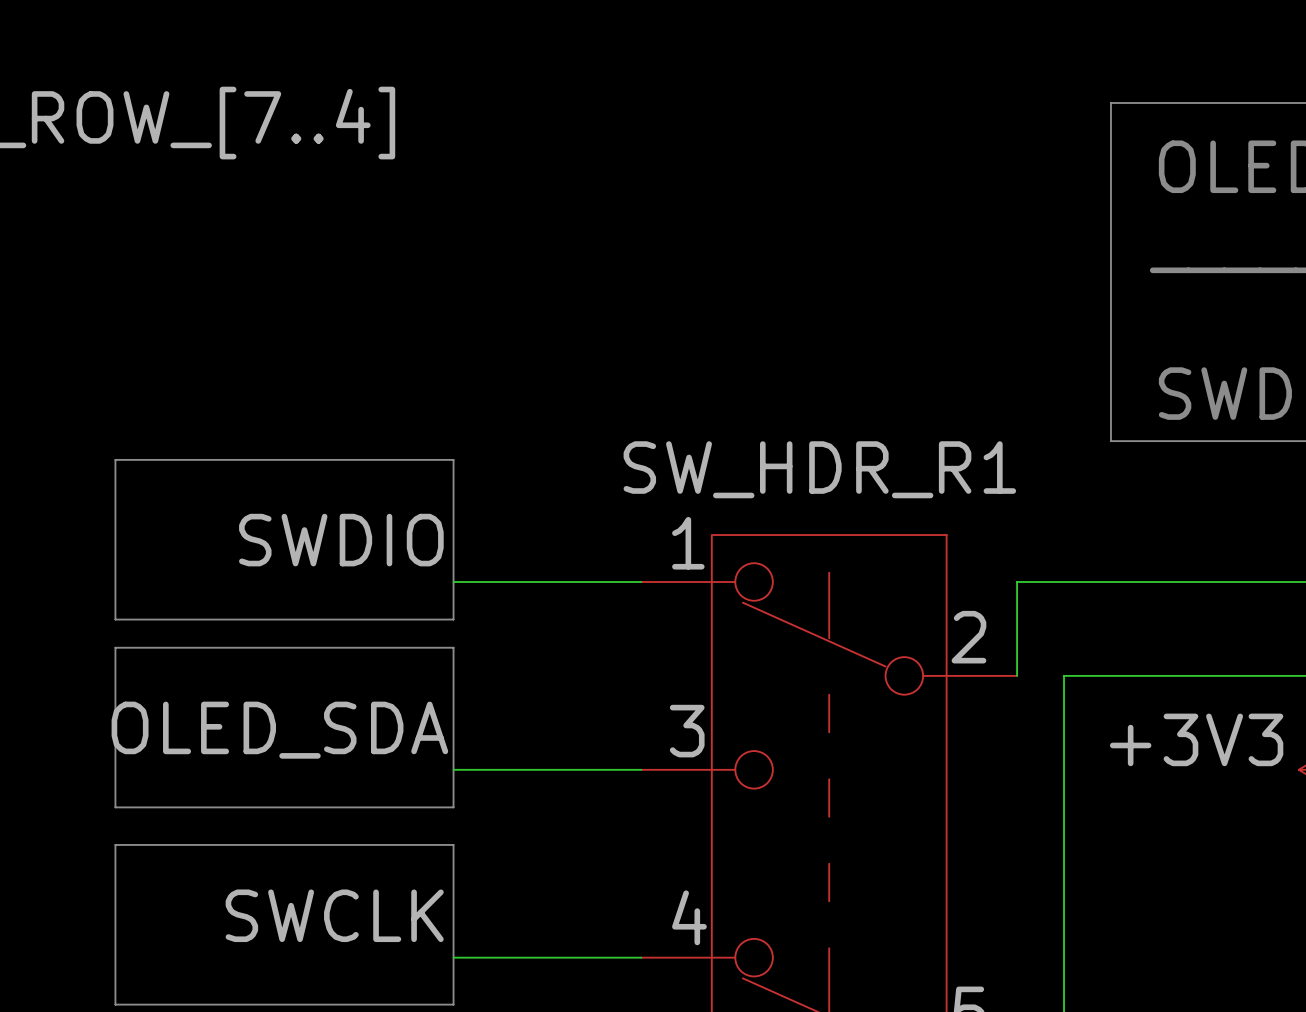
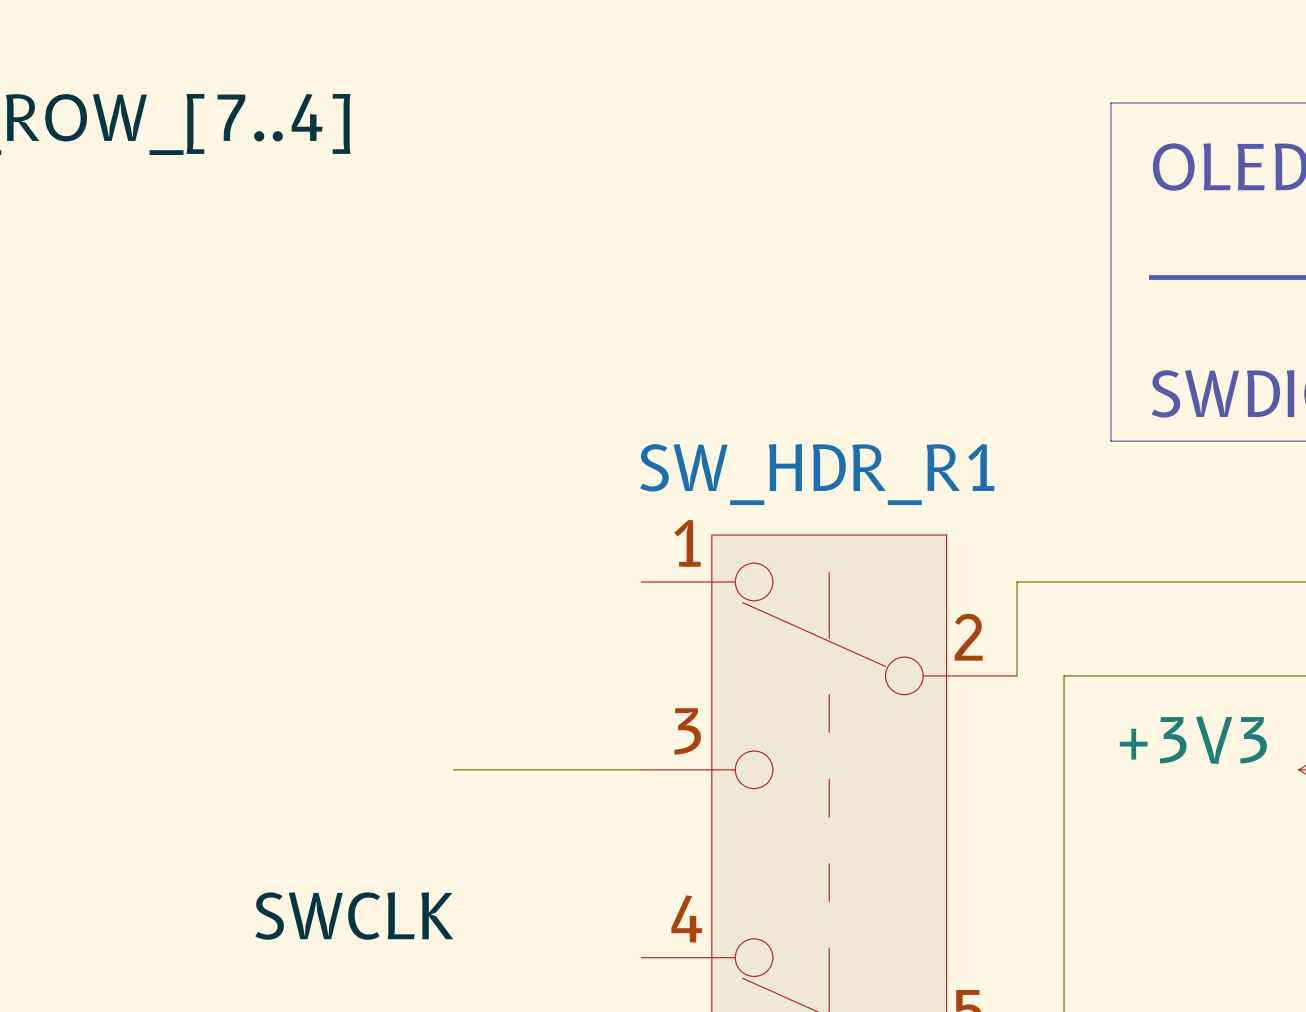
line: (115, 459) (453, 459) (453, 619) (115, 619) (115, 459) -> none
label: SWDIO (341, 540) -> none
wire: (453, 581) (641, 581) -> none
line: (115, 647) (115, 807) (453, 807) (453, 647) (115, 647) -> none
label: OLED_SDA (279, 730) -> none
line: (115, 844) (115, 1004) (453, 1004) (453, 844) (115, 844) -> none
wire: (453, 957) (641, 957) -> none

